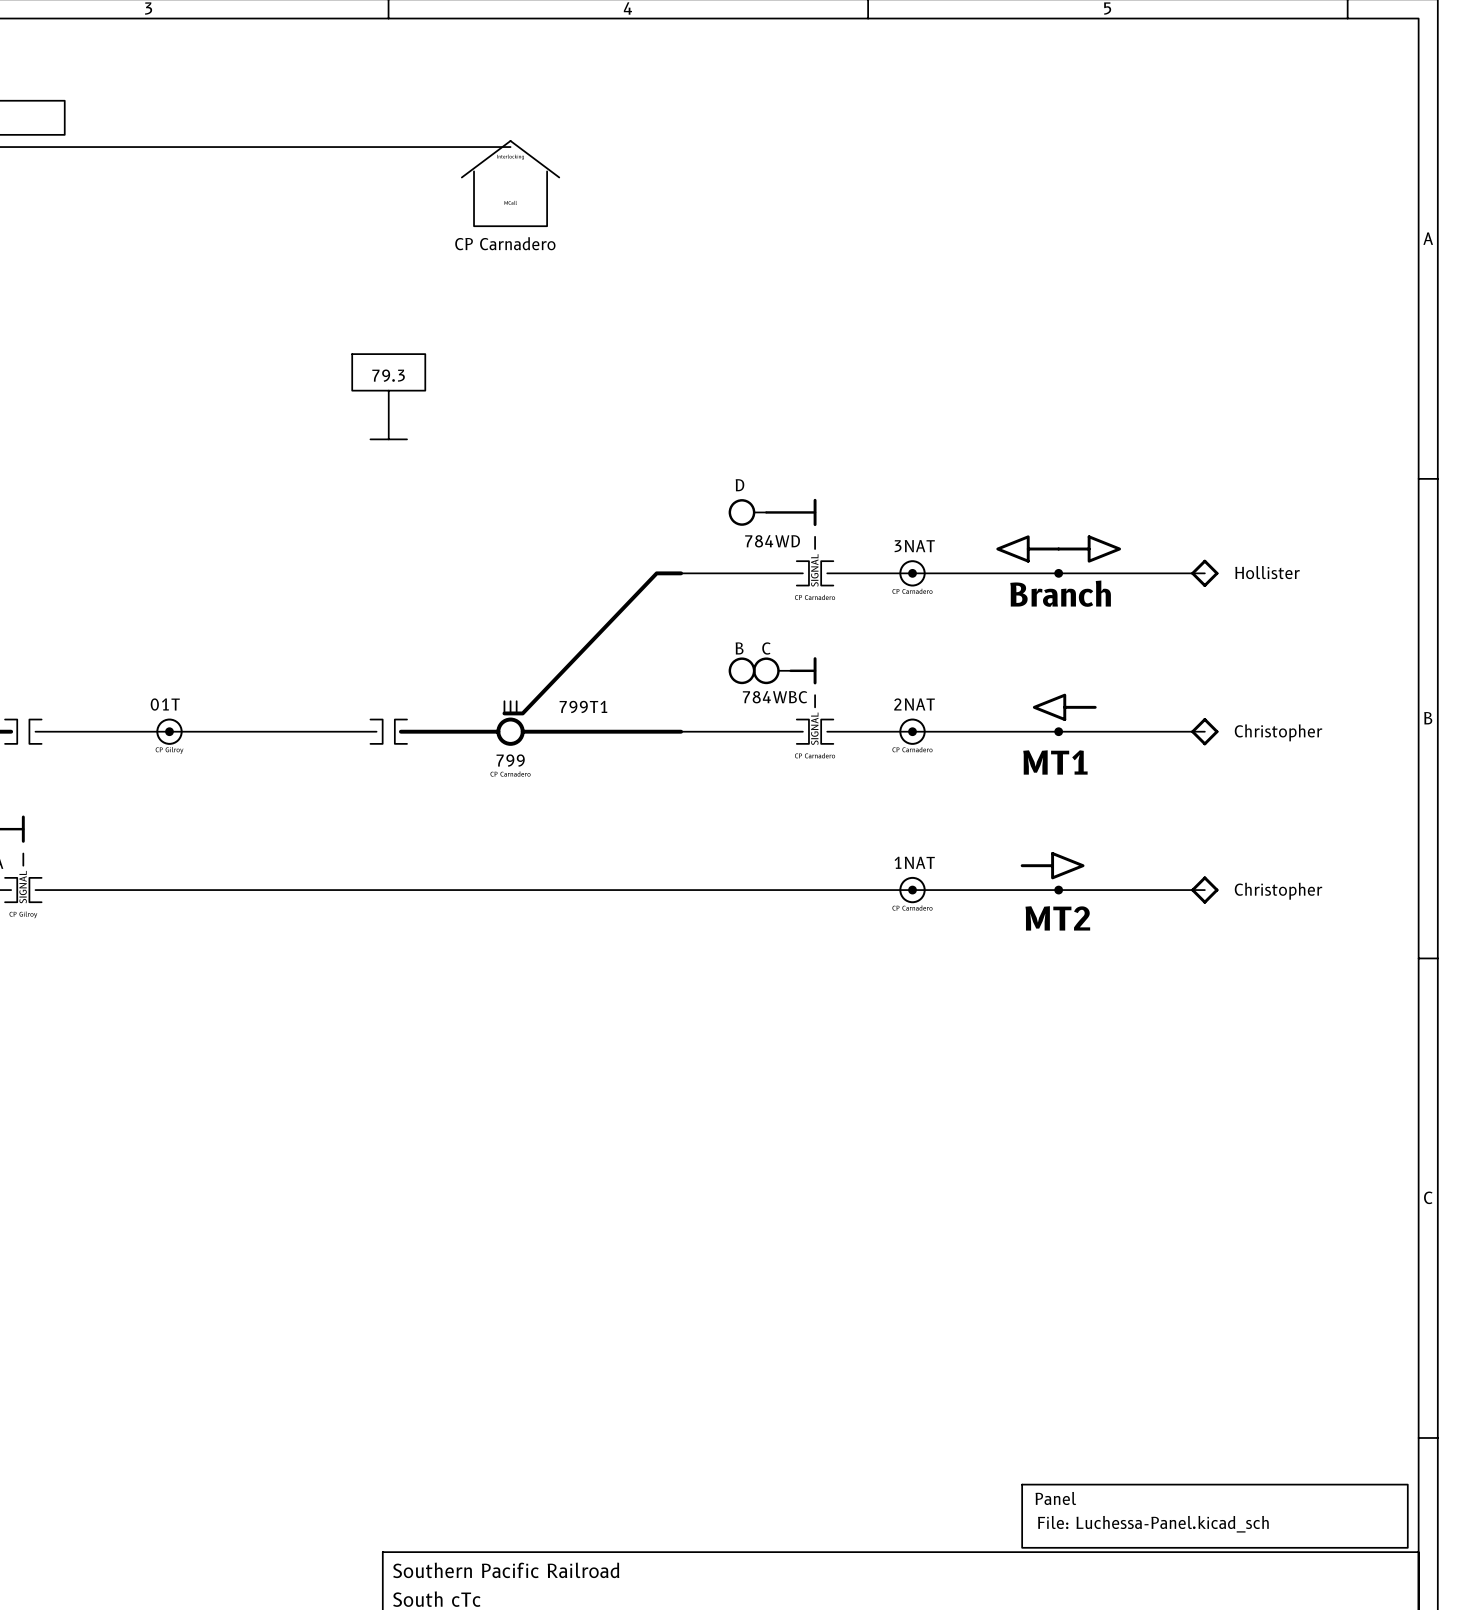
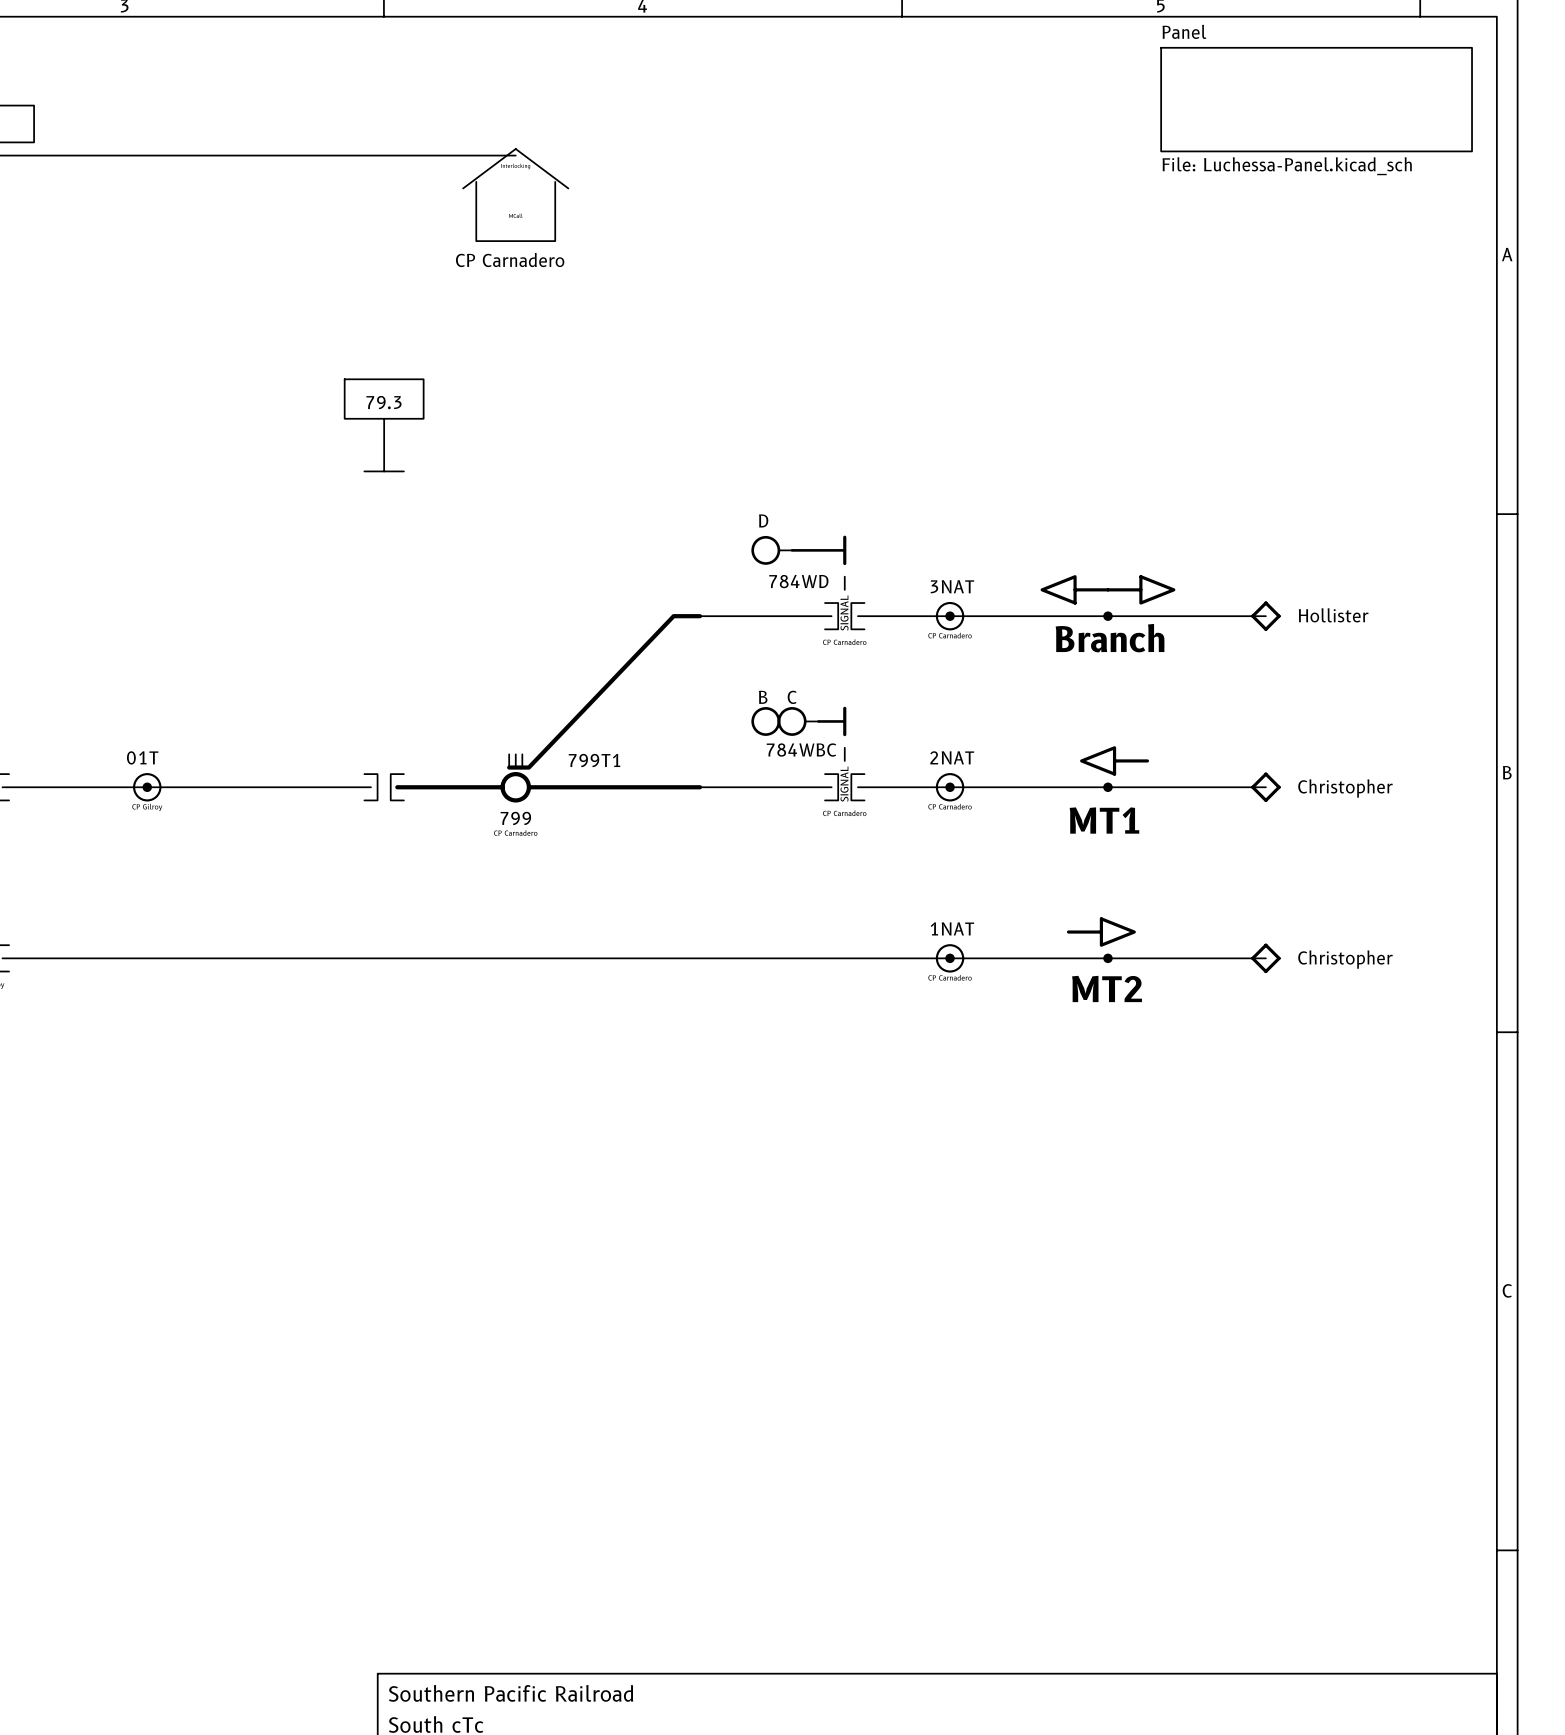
sheet Panel: none -> File: Luchessa-Panel.kicad_sch (1316, 99)
sheet Panel: File: Luchessa-Panel.kicad_sch (1214, 1516) -> none

